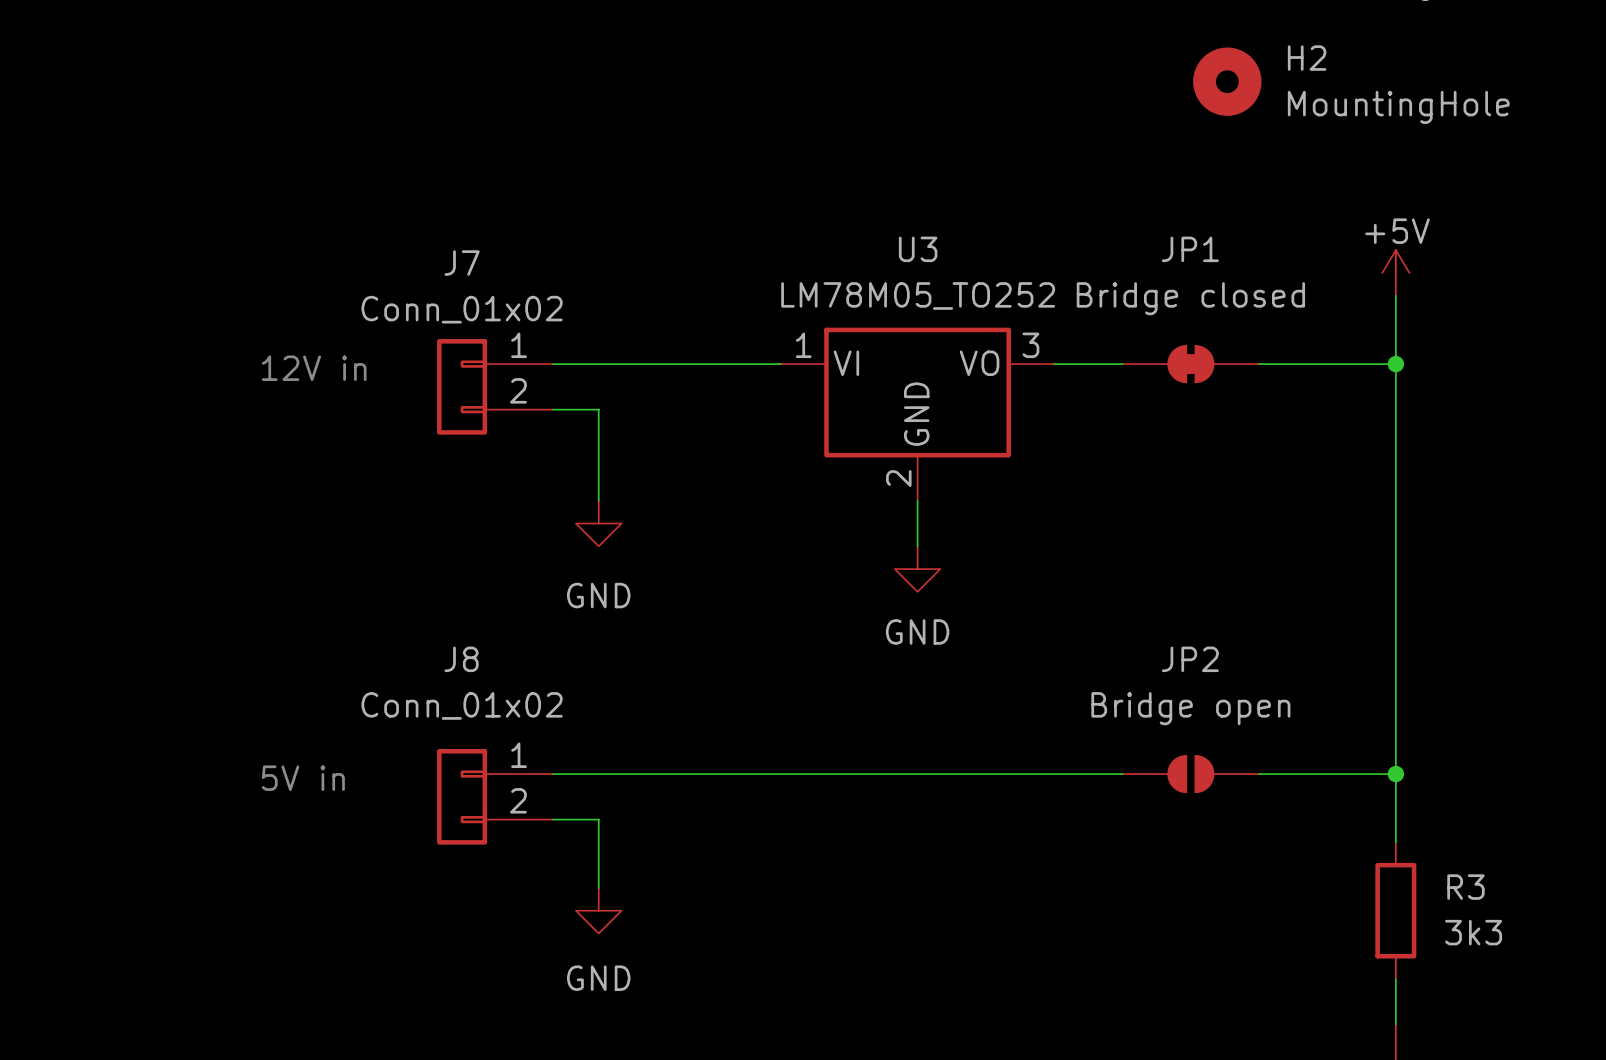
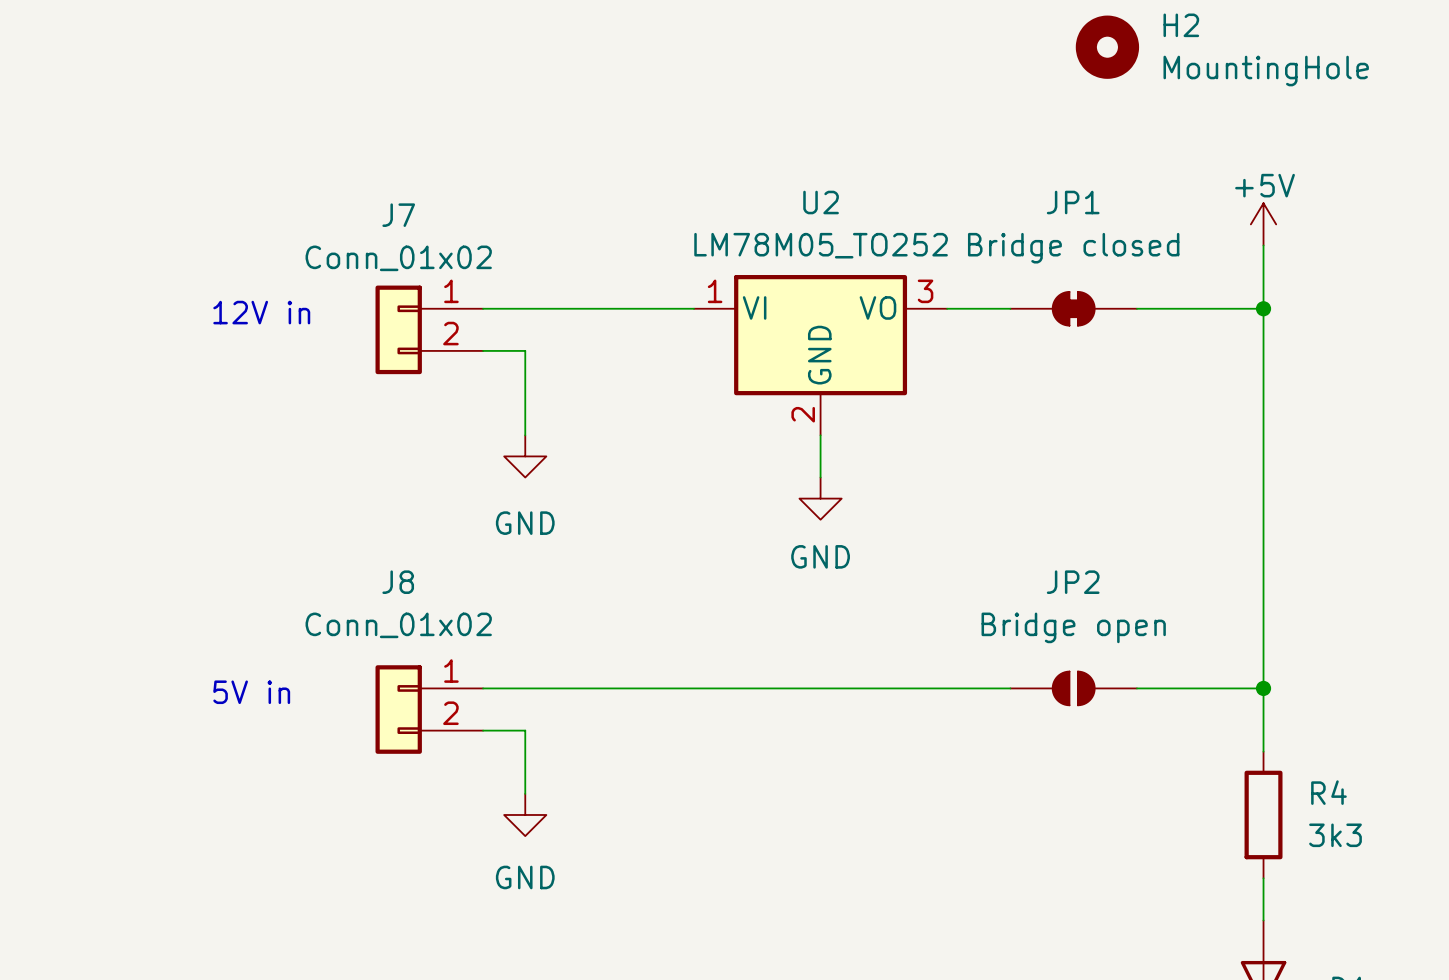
U3 name: U3 (918, 249) -> U2 (821, 202)
R3 name: R3 (1465, 887) -> R4 (1328, 792)

